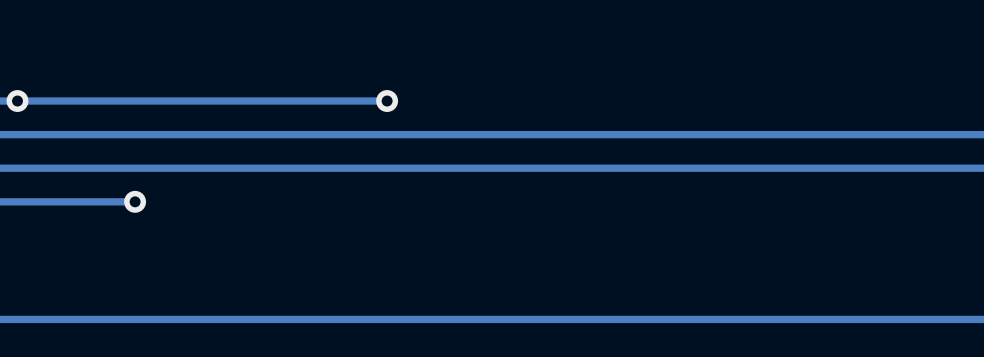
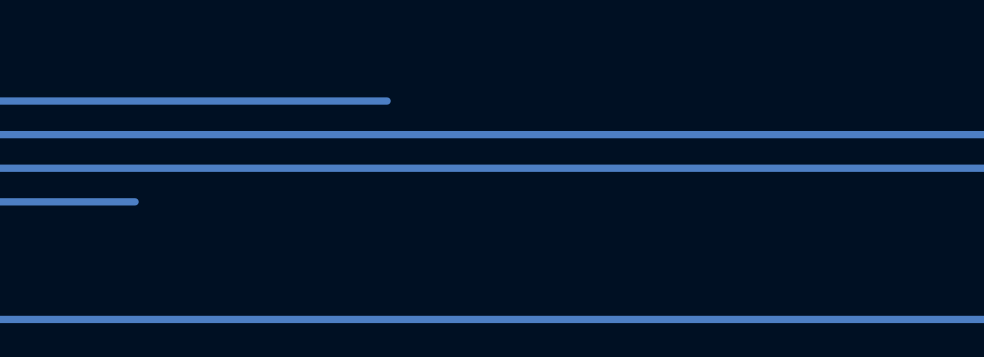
via: (17, 101) -> none
via: (387, 101) -> none
via: (135, 201) -> none

